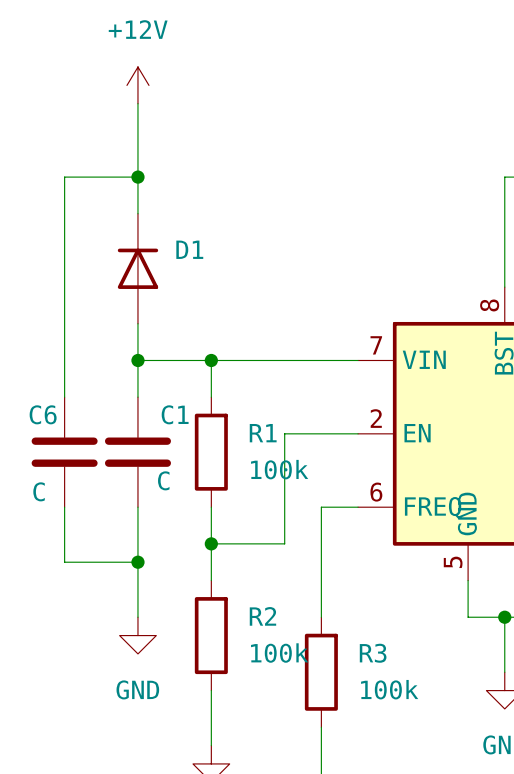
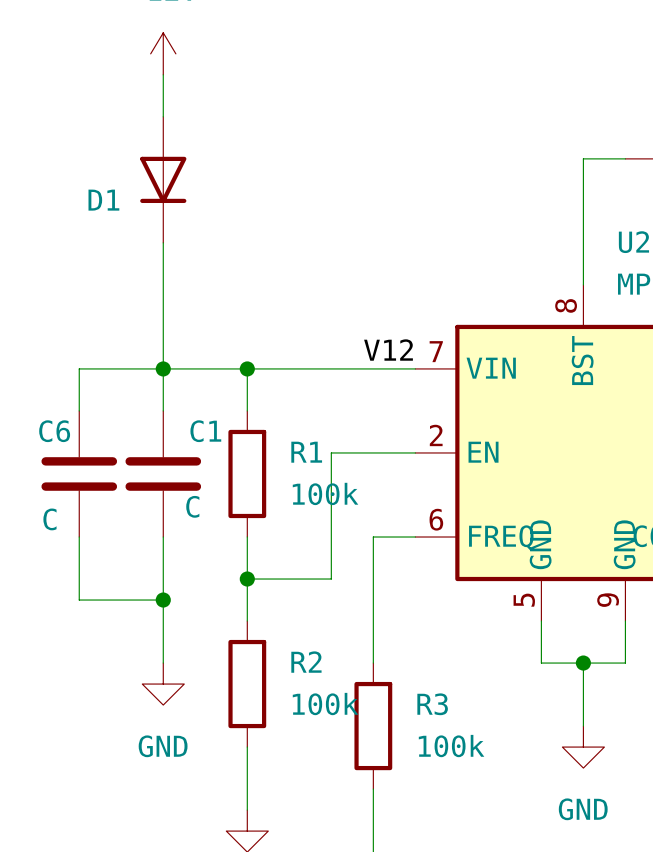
wire: (137, 177) (64, 177) (64, 360) -> (163, 368) (79, 368)
junction: (137, 177) -> none
D1 rotation: 0° (137, 268) -> 180° (163, 179)
D1 position: (137, 268) -> (163, 179)
label: none -> V12 (388, 350)

